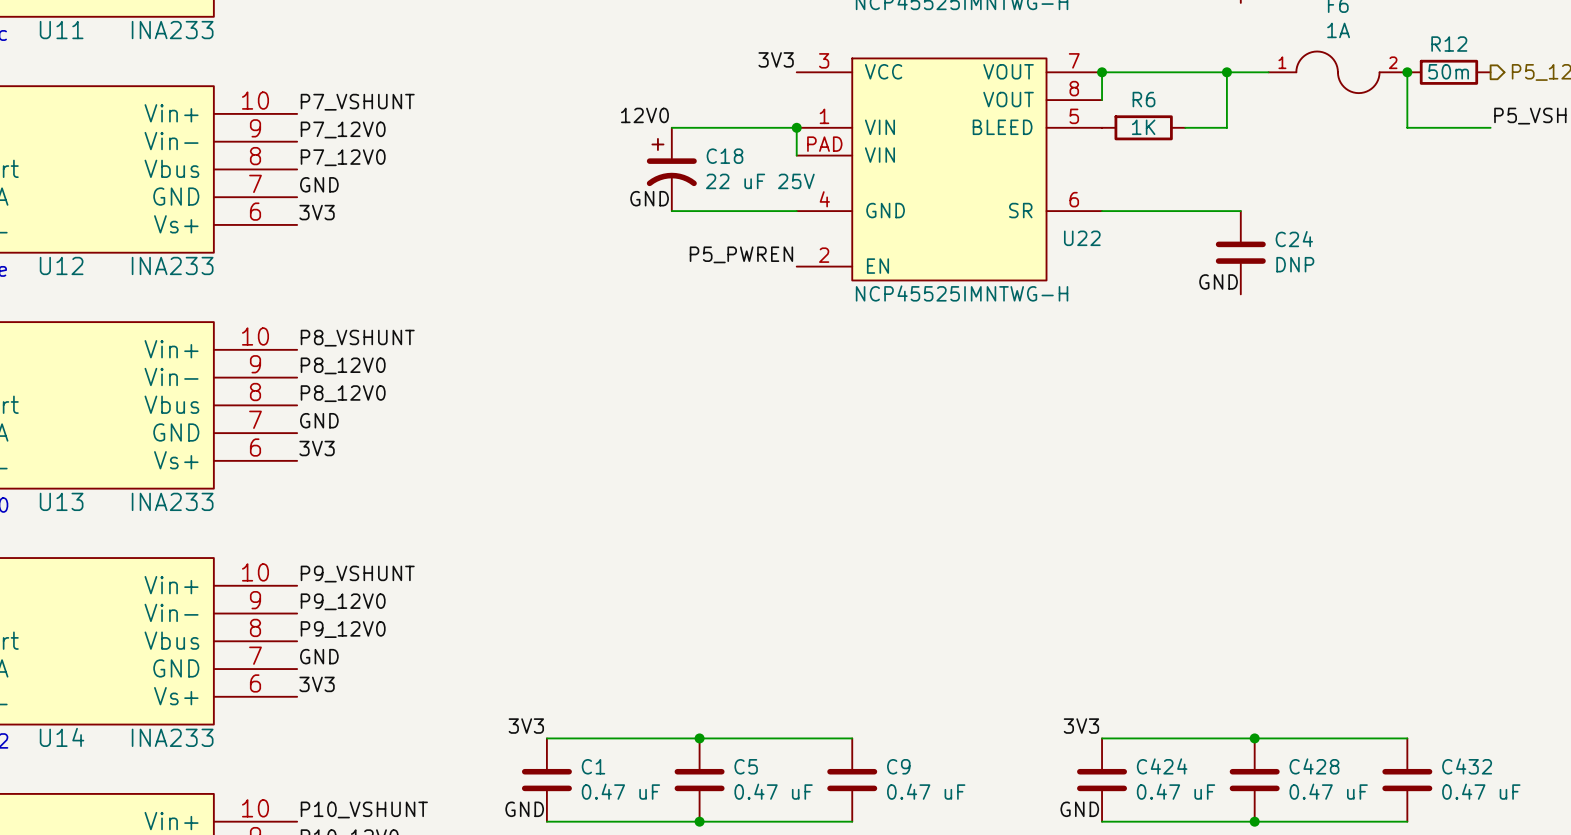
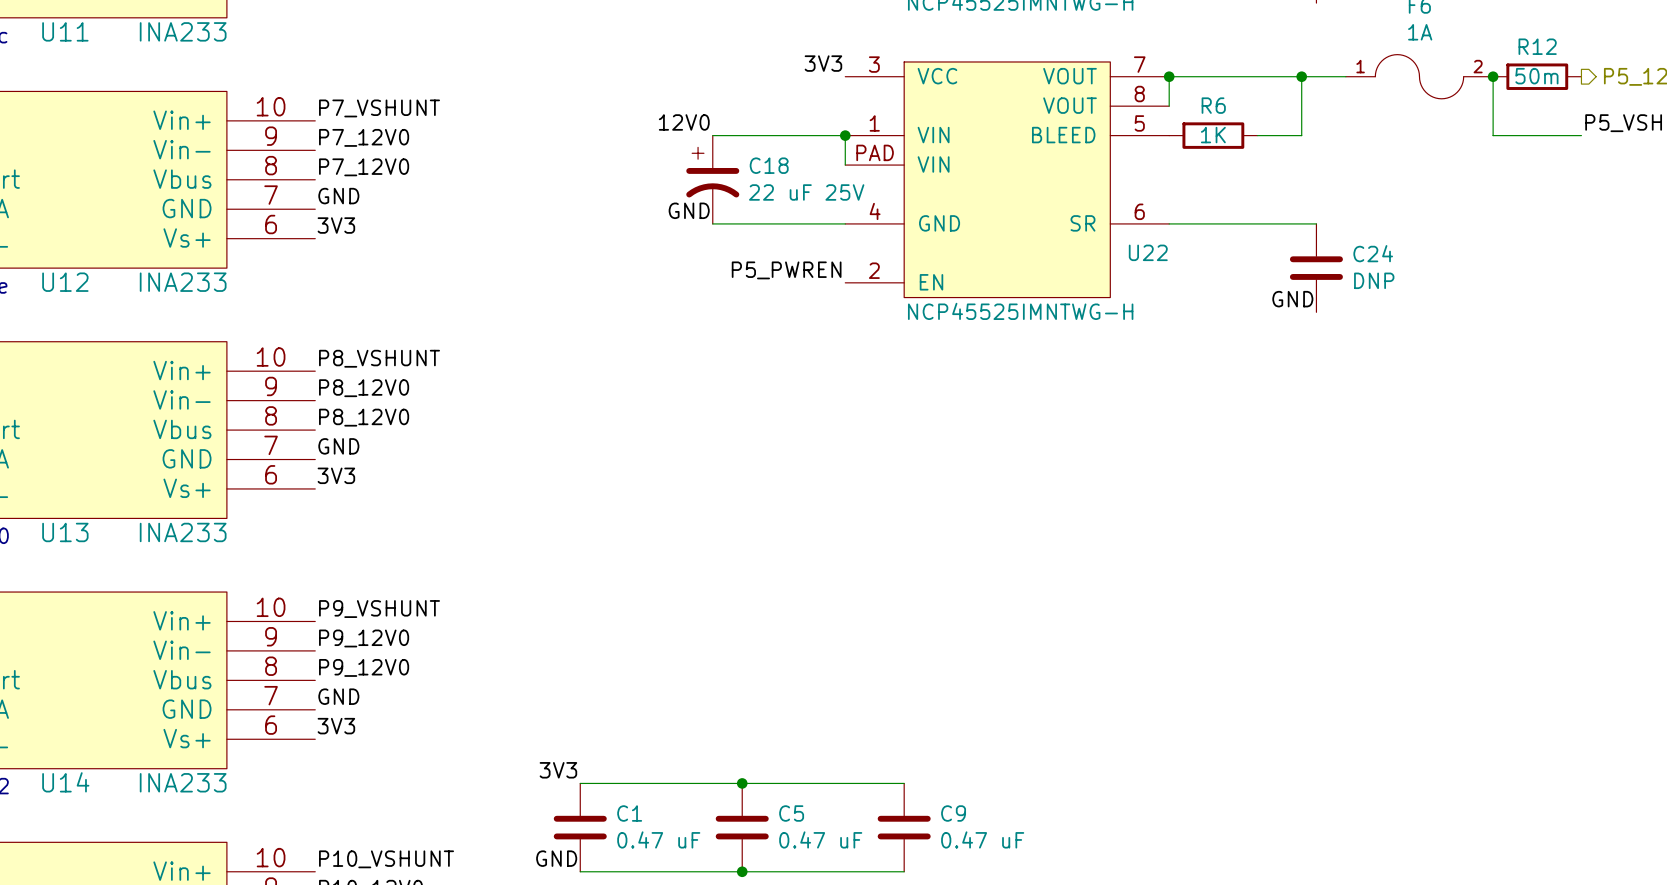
label: 3V3 (1081, 726) -> none
wire: (1102, 738) (1407, 738) -> none
junction: (1254, 738) -> none
C424: 0.47 uF (1102, 780) -> none
C428: 0.47 uF (1254, 780) -> none
C432: 0.47 uF (1407, 780) -> none
label: GND (1079, 809) -> none
wire: (1102, 821) (1407, 821) -> none
junction: (1254, 821) -> none

